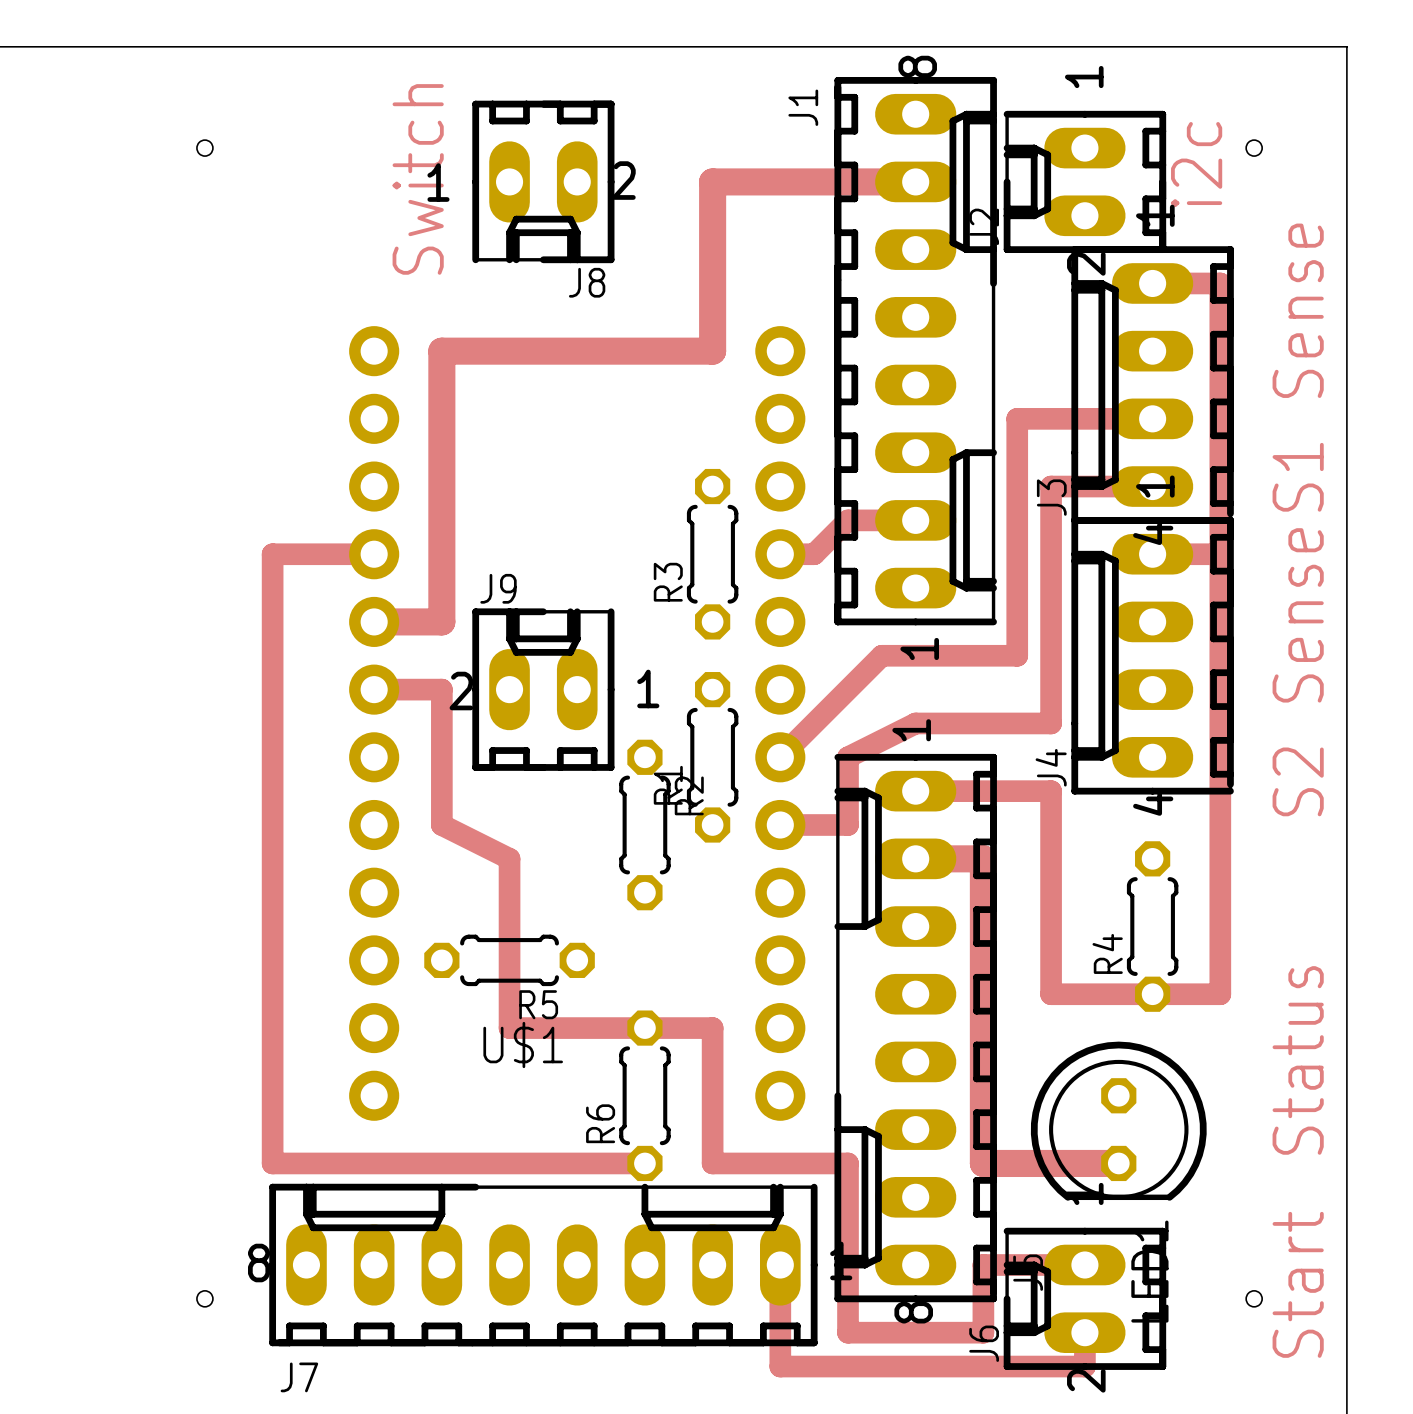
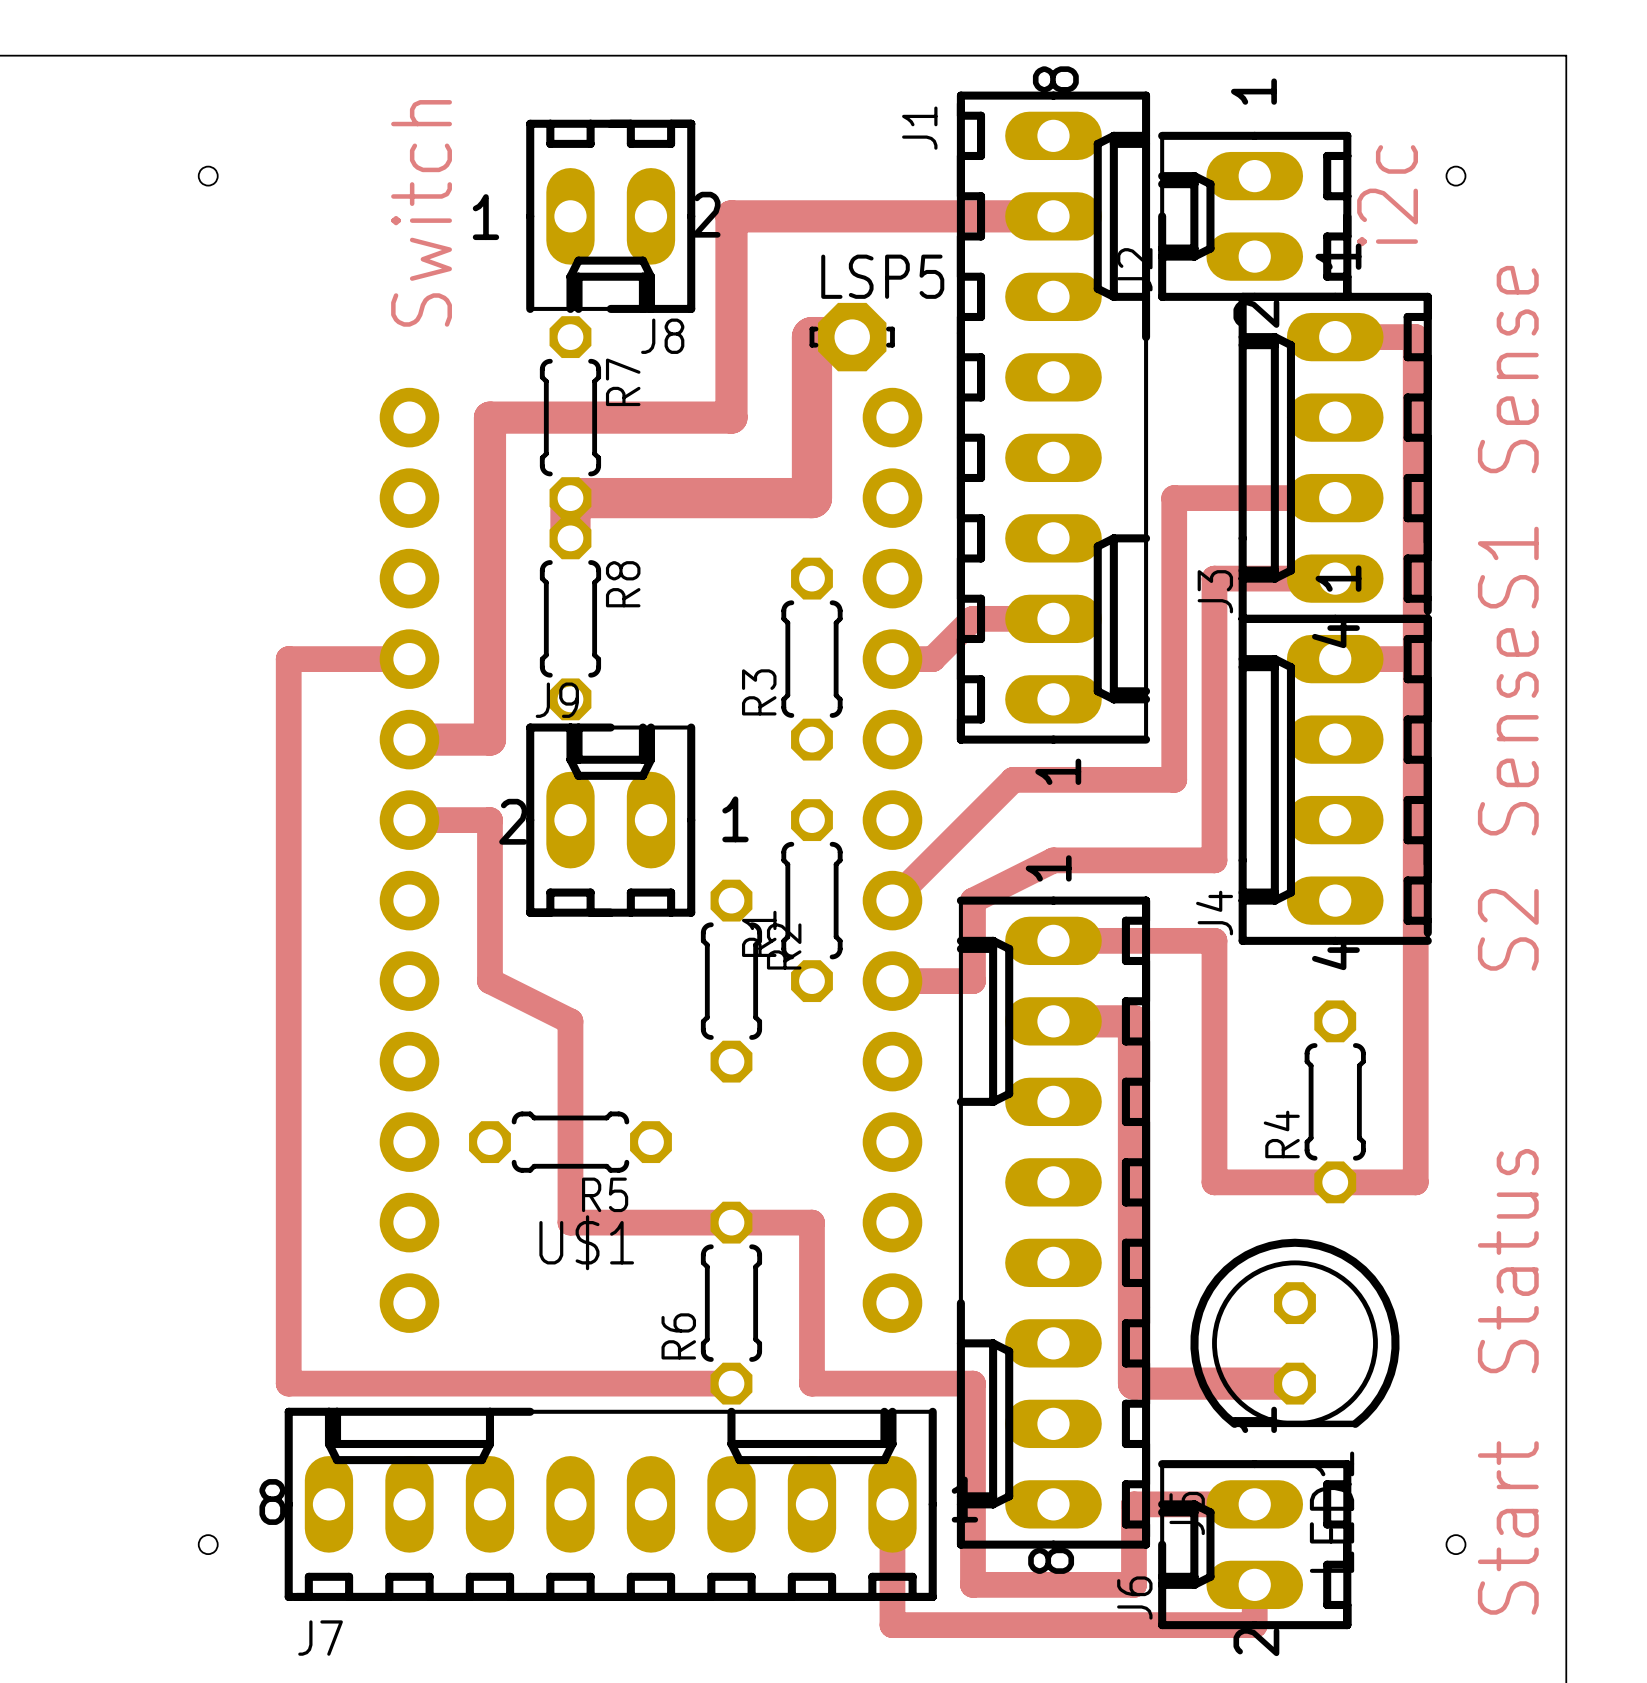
text position: Switch (418, 179) -> Switch (421, 213)
track: (712, 181) (712, 283) -> (811, 216) (731, 216) (731, 417)
track width: thin (712, 283) (712, 351) -> thick (811, 337) (811, 417)
LSP5: none -> (852, 337)
R7: none -> (570, 417)
track: (644, 351) (712, 351) -> (570, 538) (570, 498) (811, 498) (811, 417)
R8: none -> (570, 618)

